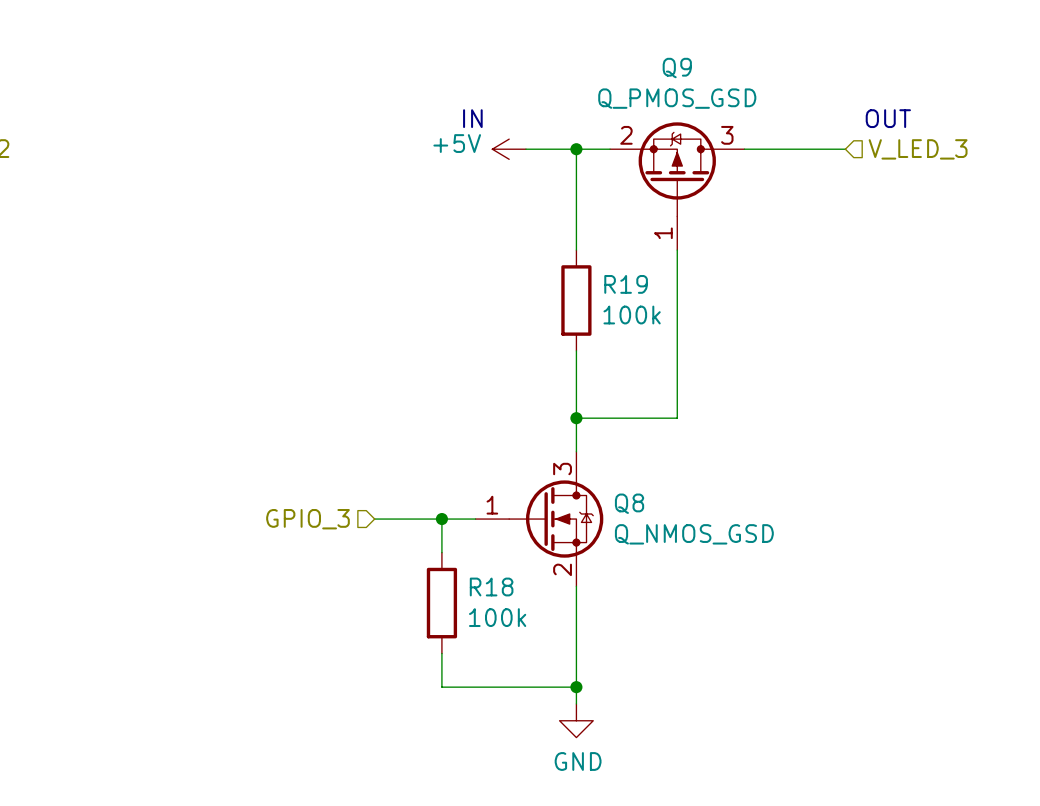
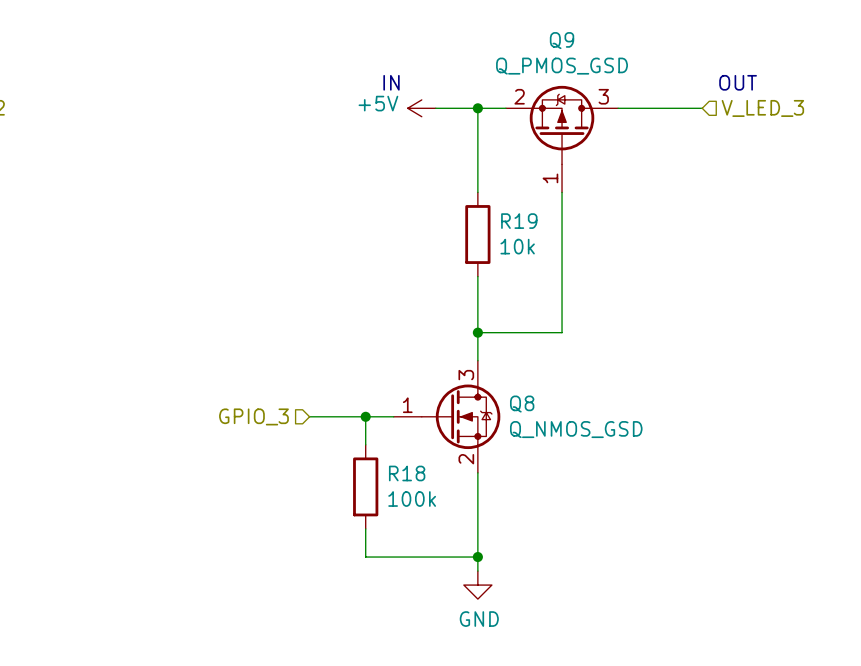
R19 value: 100k (632, 315) -> 10k (517, 246)

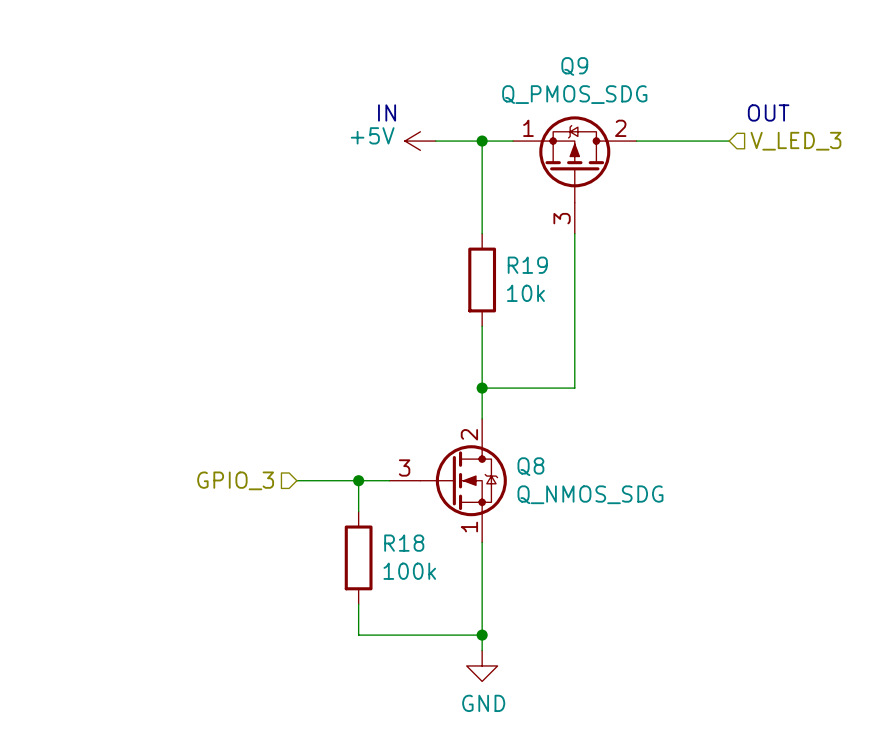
Q9 value: Q_PMOS_GSD (562, 66) -> Q_PMOS_SDG (574, 94)
Q9 pin number: 2 (519, 96) -> 1 (528, 128)
Q9 pin number: 3 (603, 96) -> 2 (620, 128)
Q9 pin number: 1 (550, 178) -> 3 (562, 218)
Q8 pin number: 3 (466, 375) -> 2 (469, 434)
Q8 pin number: 1 (407, 405) -> 3 (404, 467)
Q8 value: Q_NMOS_GSD (576, 429) -> Q_NMOS_SDG (590, 494)
Q8 pin number: 2 (466, 459) -> 1 (469, 527)

